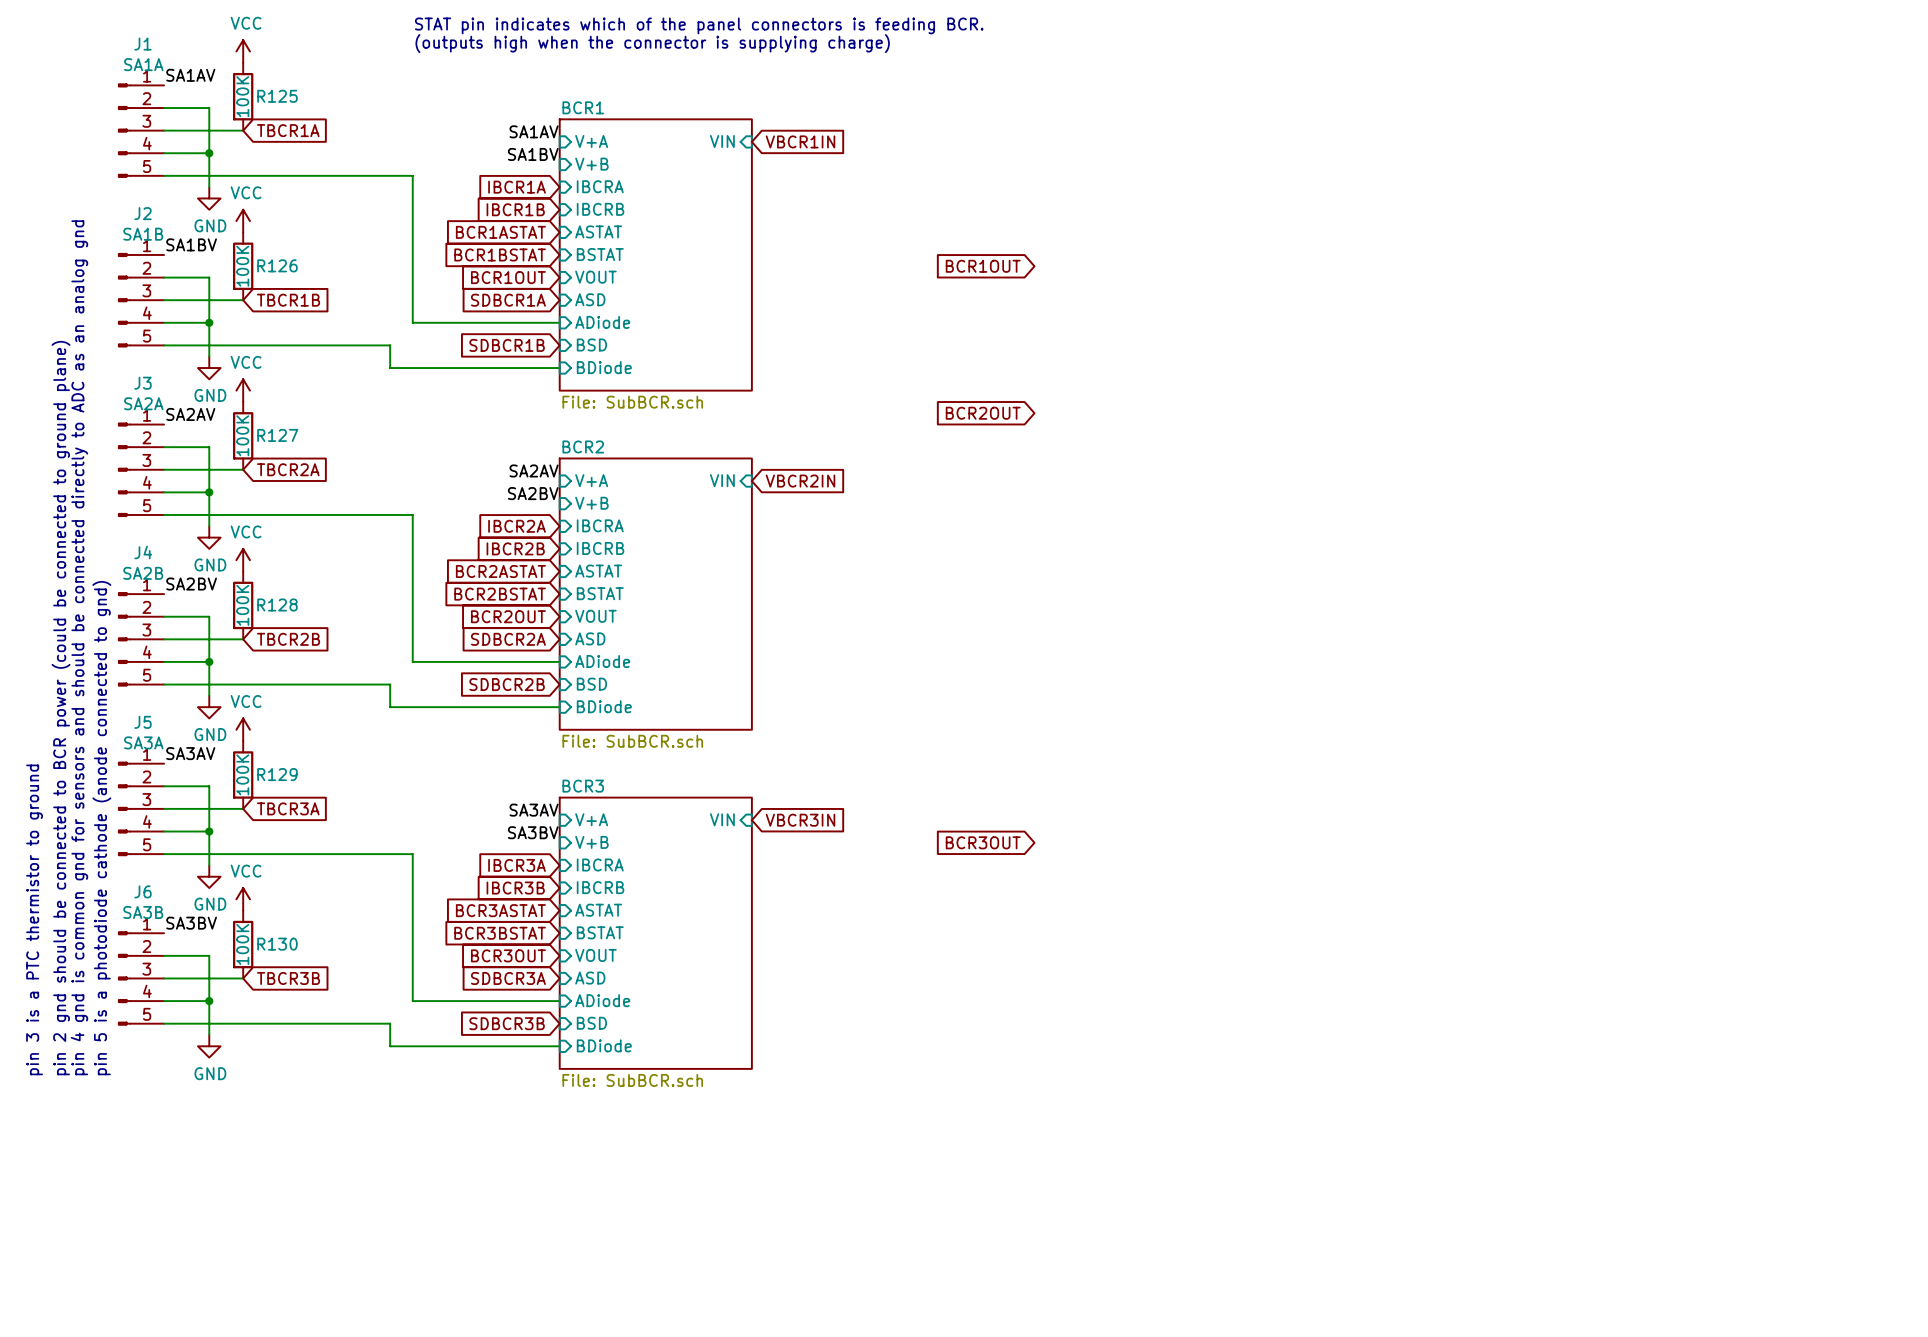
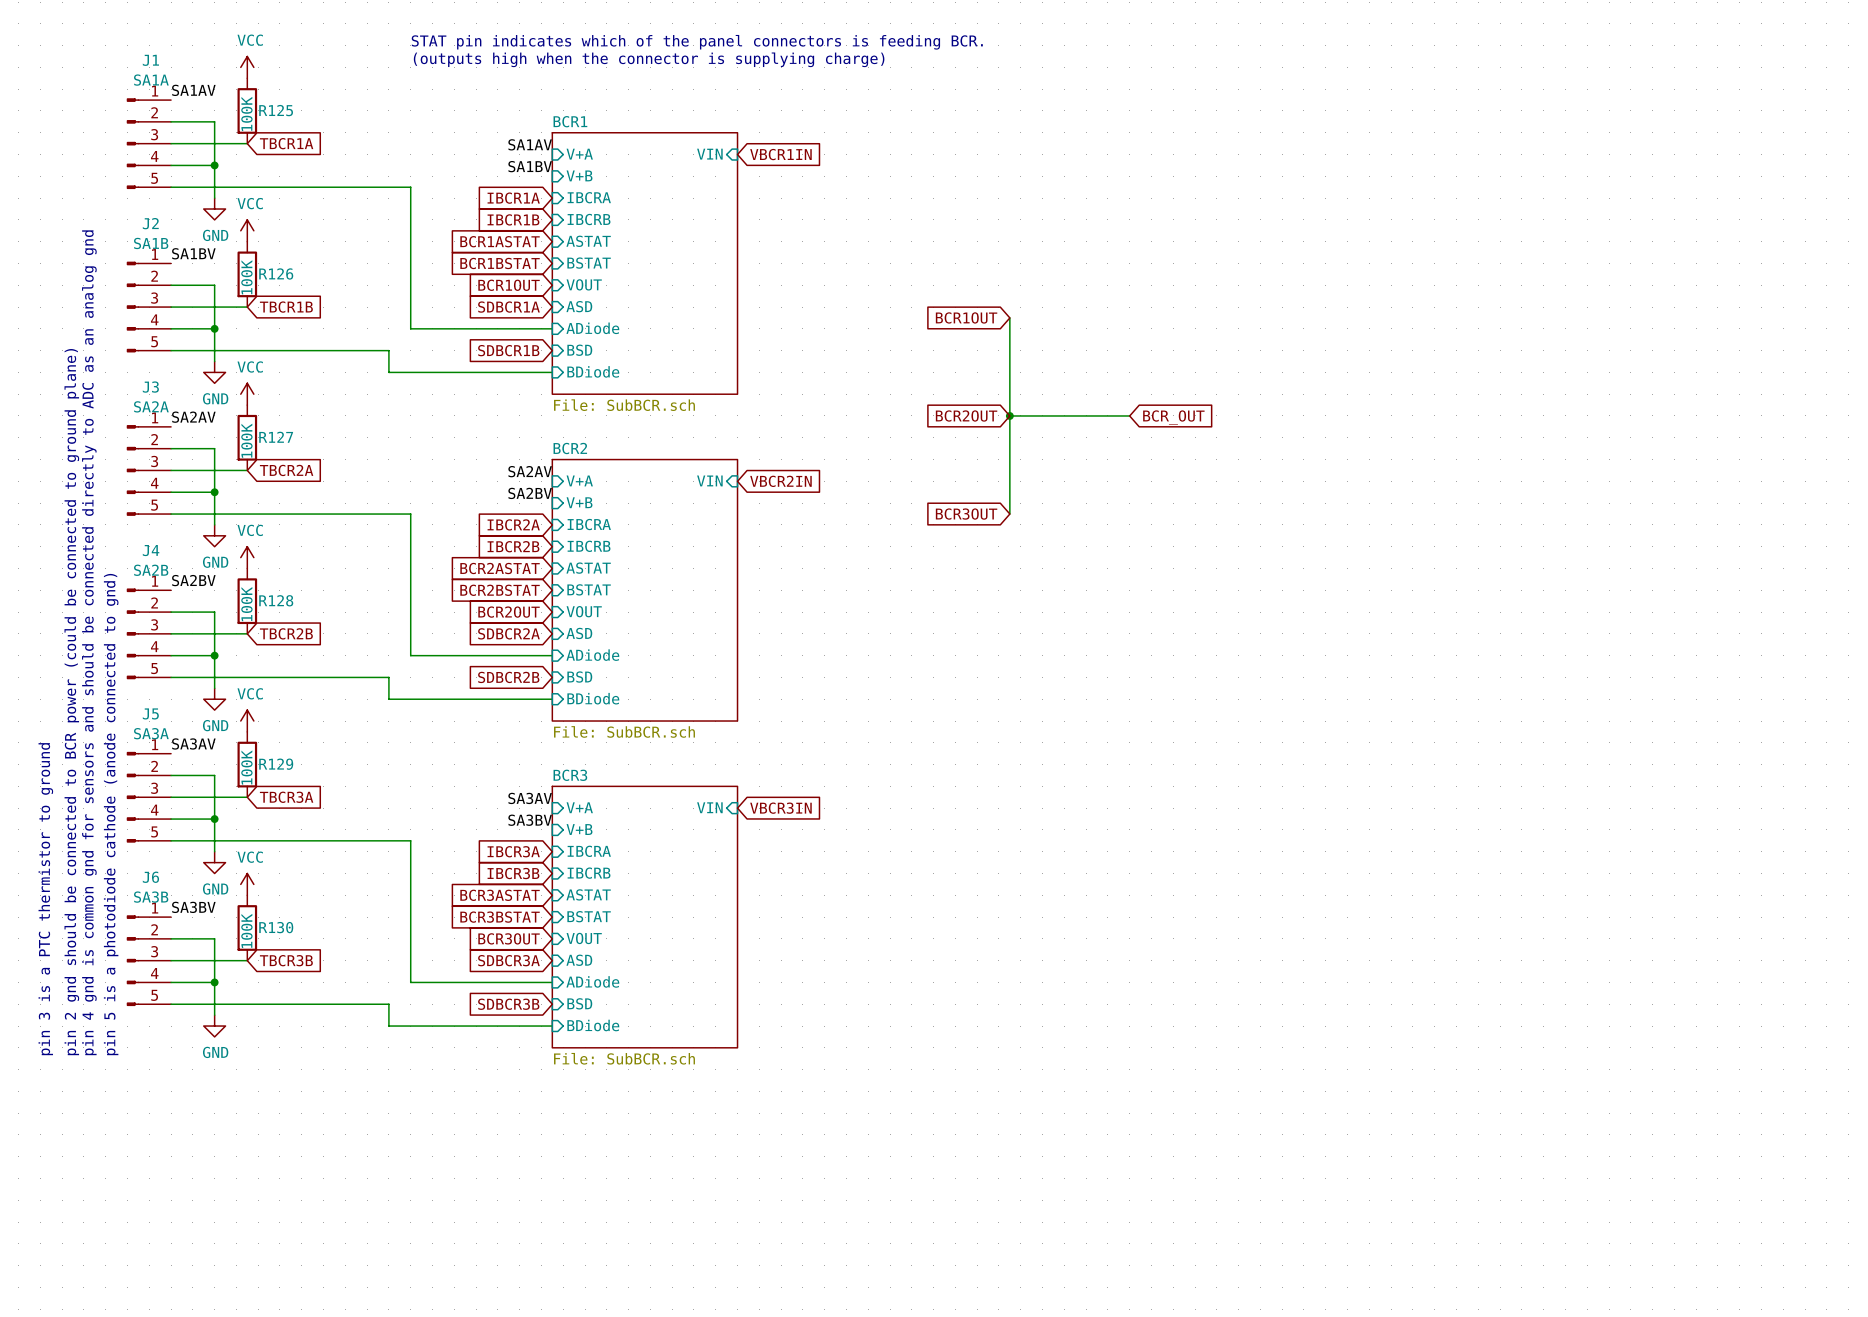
global label position: BCR1OUT (983, 266) -> BCR1OUT (966, 317)
wire: none -> (1009, 317) (1009, 514)
wire: none -> (1009, 415) (1129, 415)
junction: none -> (1009, 415)
global label: none -> BCR_OUT (1173, 417)
global label: none -> BCR3OUT (966, 514)
global label: BCR3OUT (983, 842) -> none

